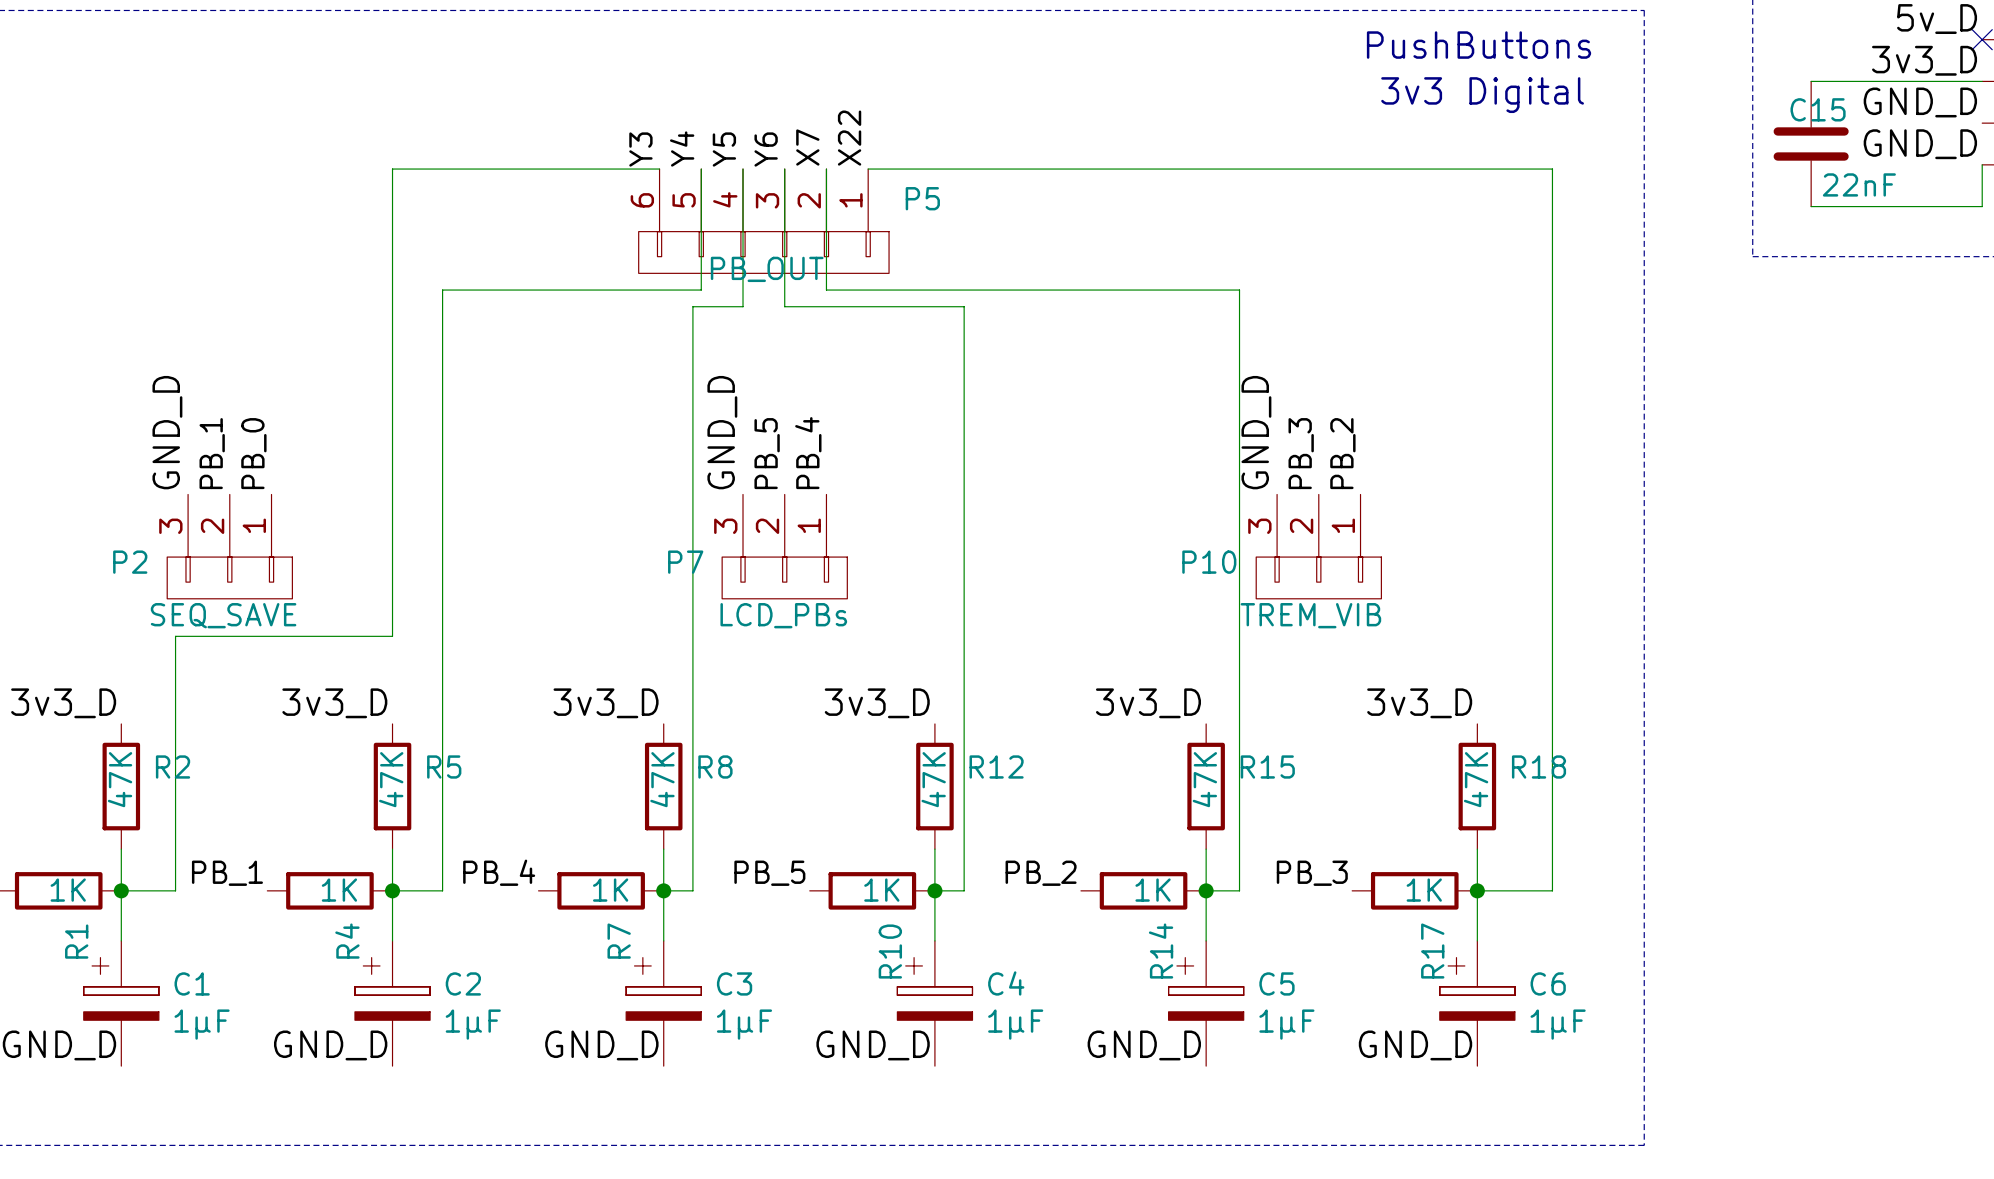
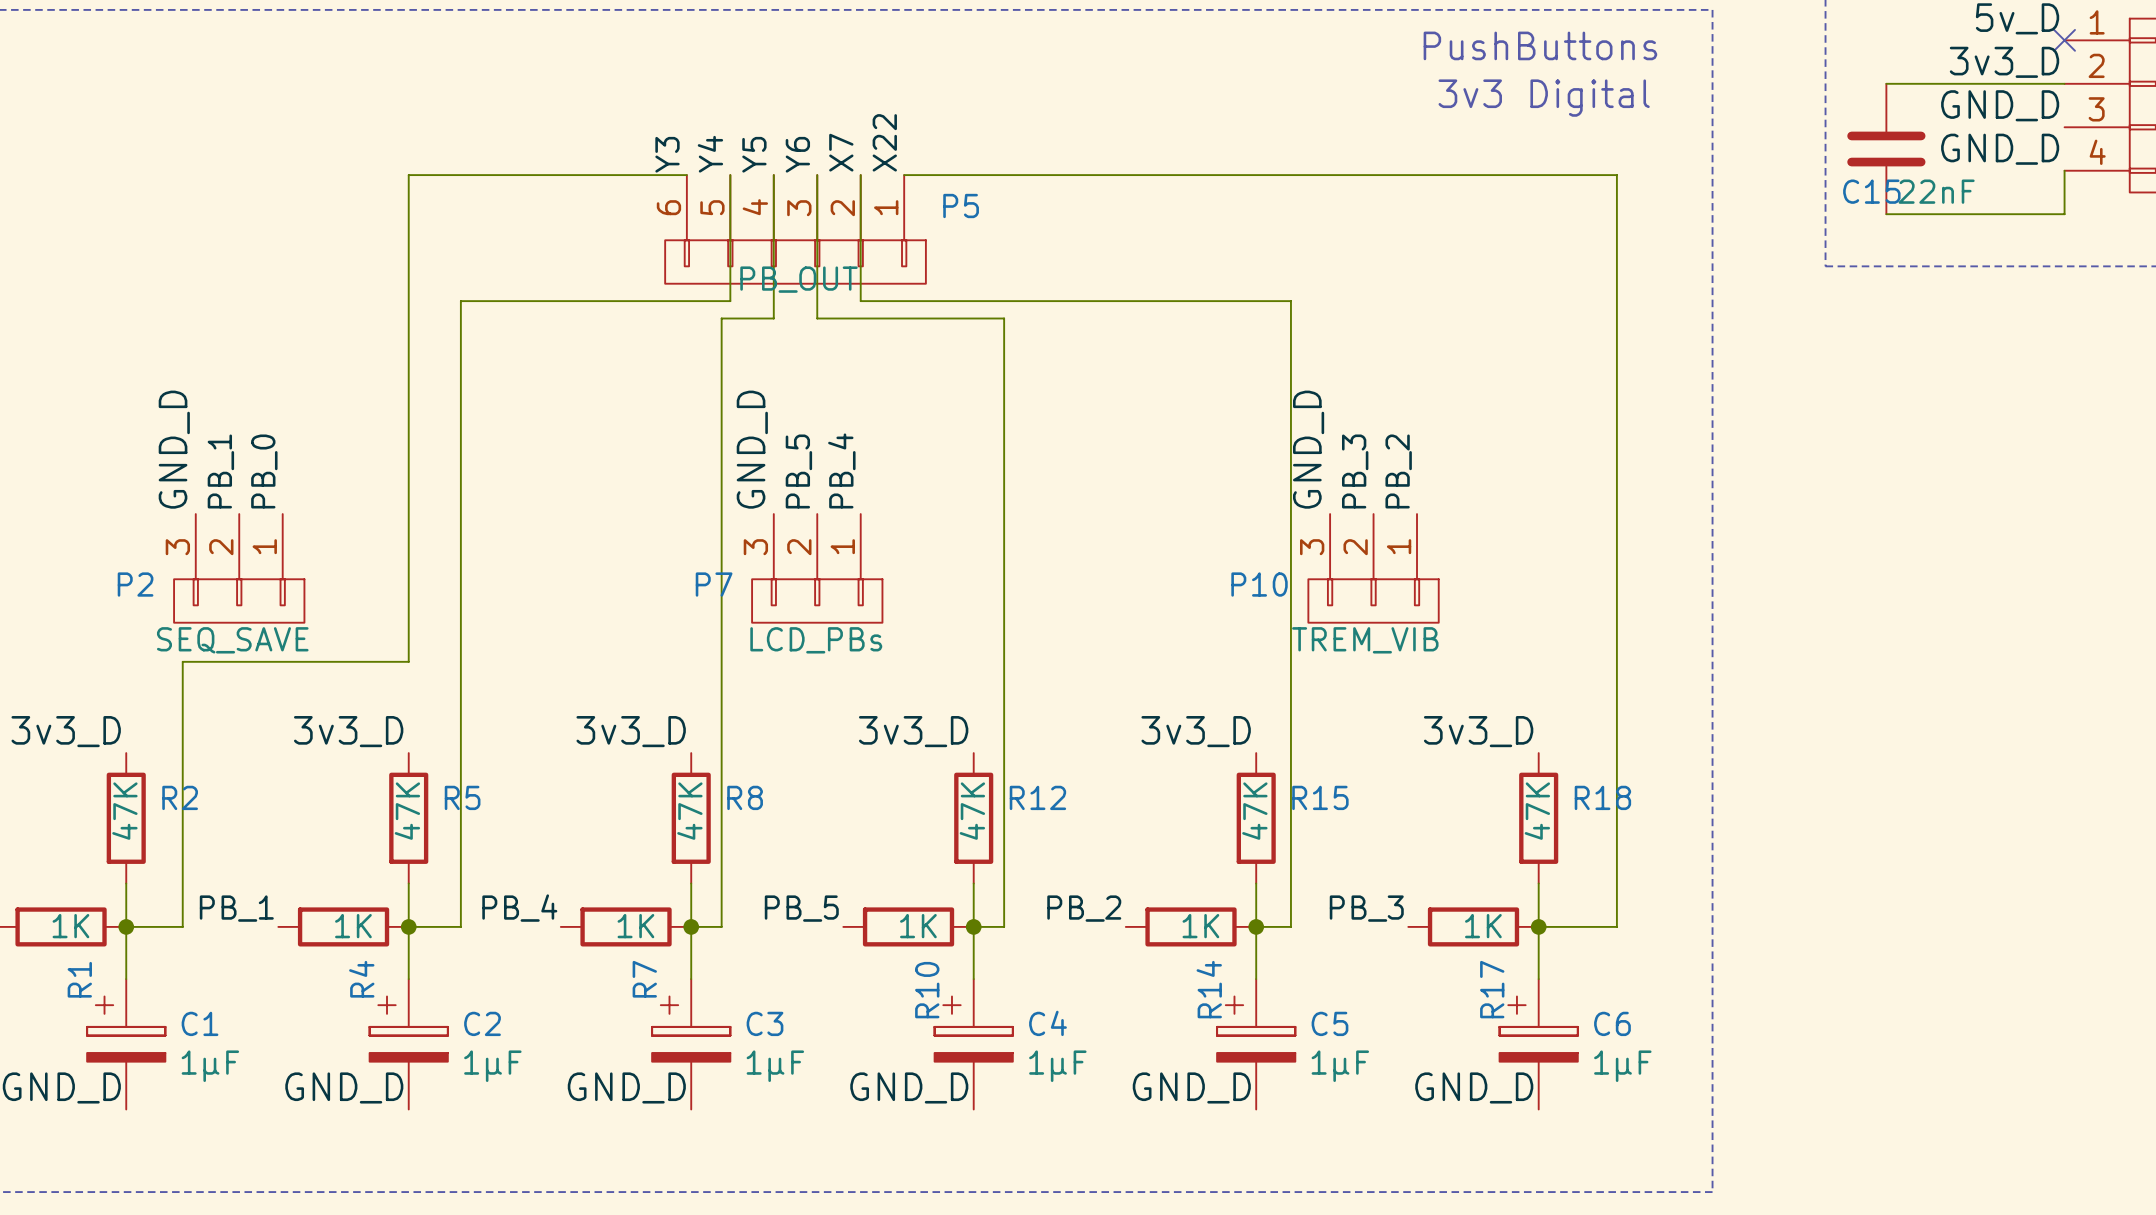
C15 name position: C15 (1818, 109) -> C15 (1871, 191)

